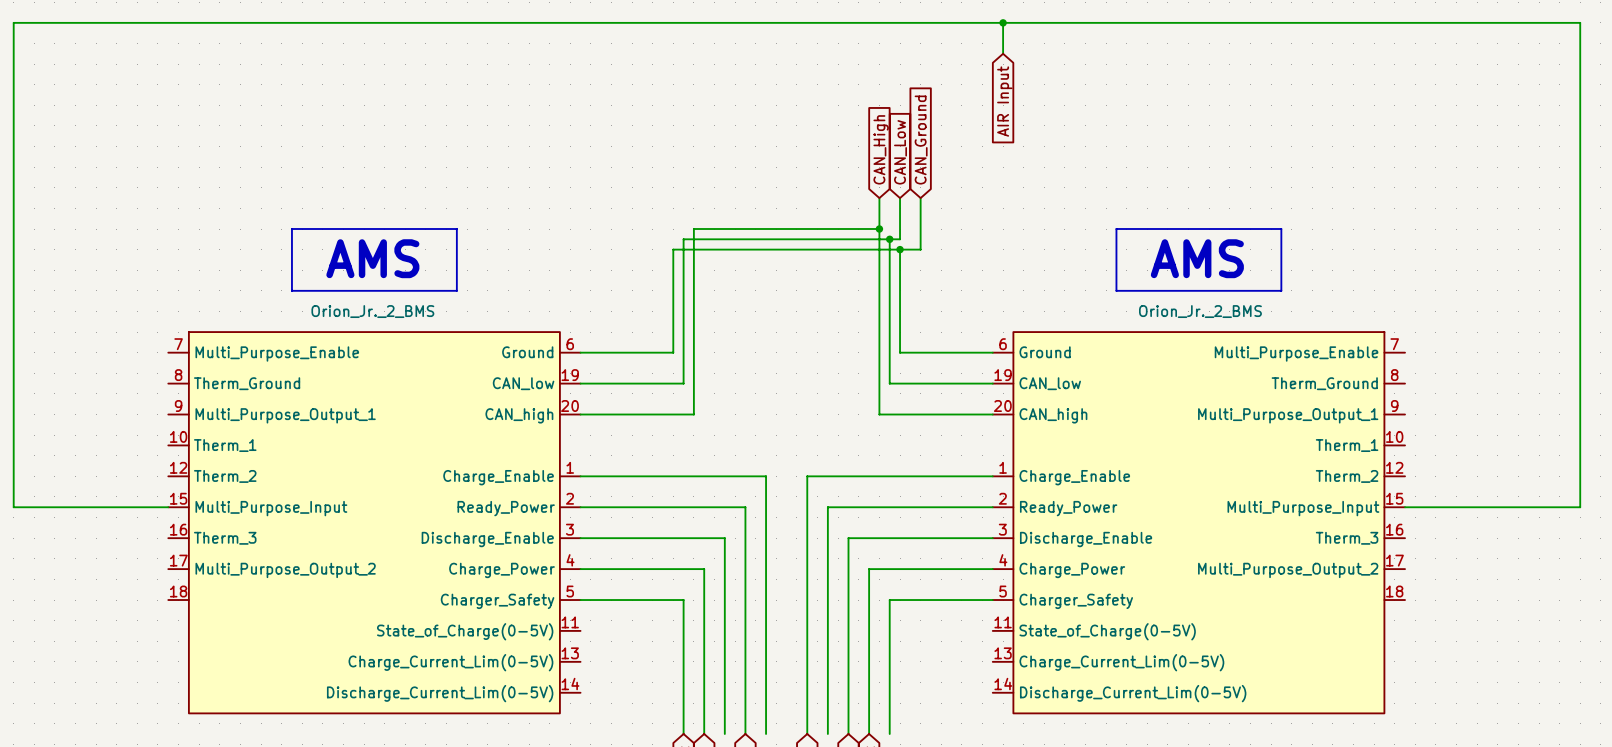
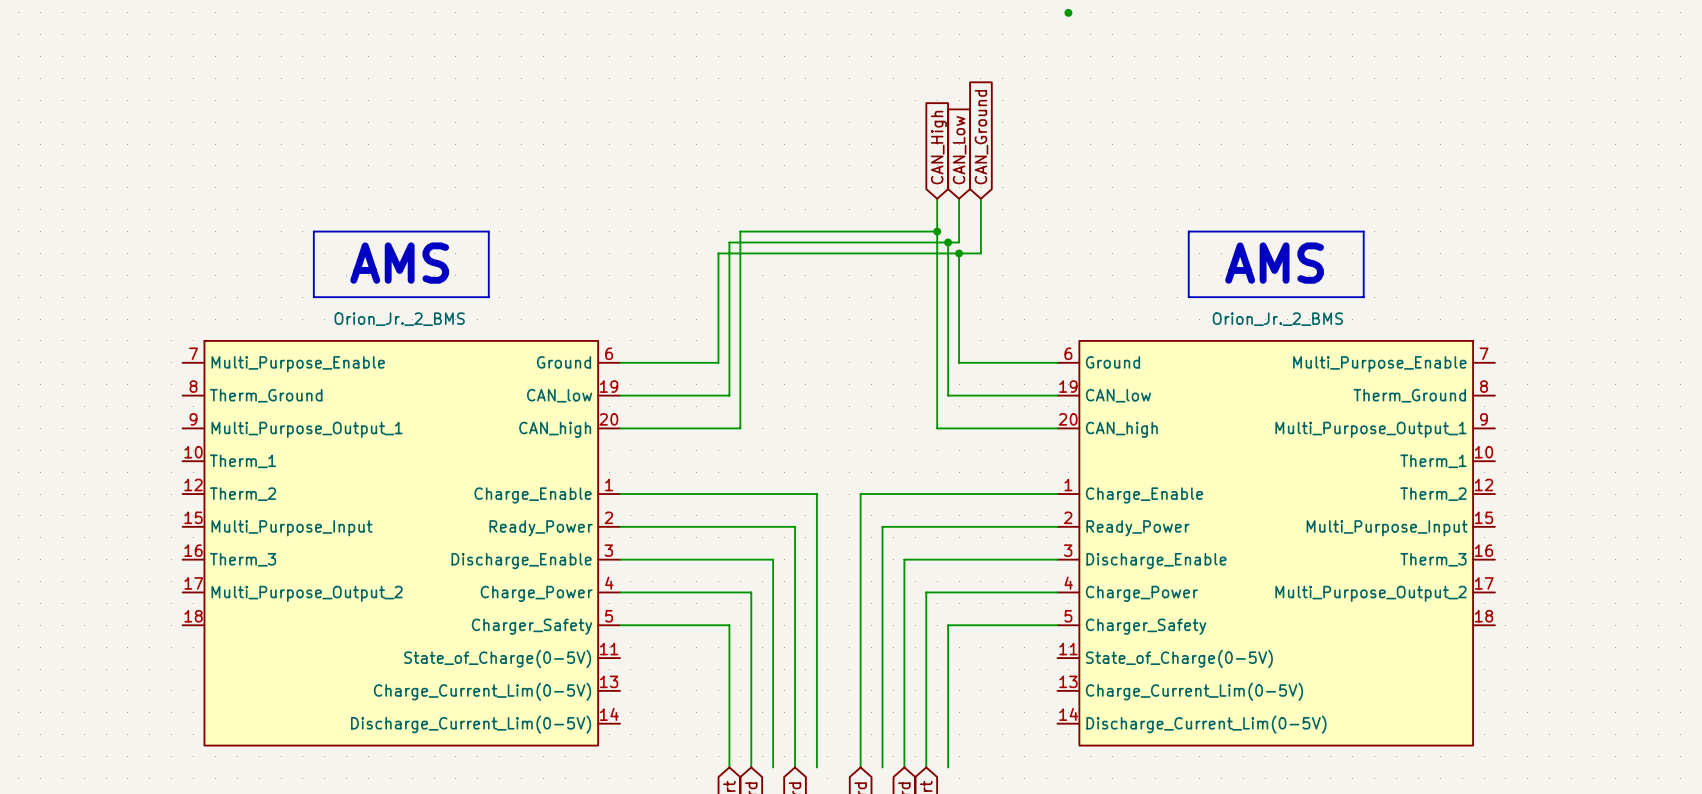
wire: (1003, 22) (1003, 53) -> none
global label: AIR Input (1004, 101) -> none
wire: (168, 507) (13, 507) (13, 22) (1580, 22) (1580, 507) (1405, 507) -> none

